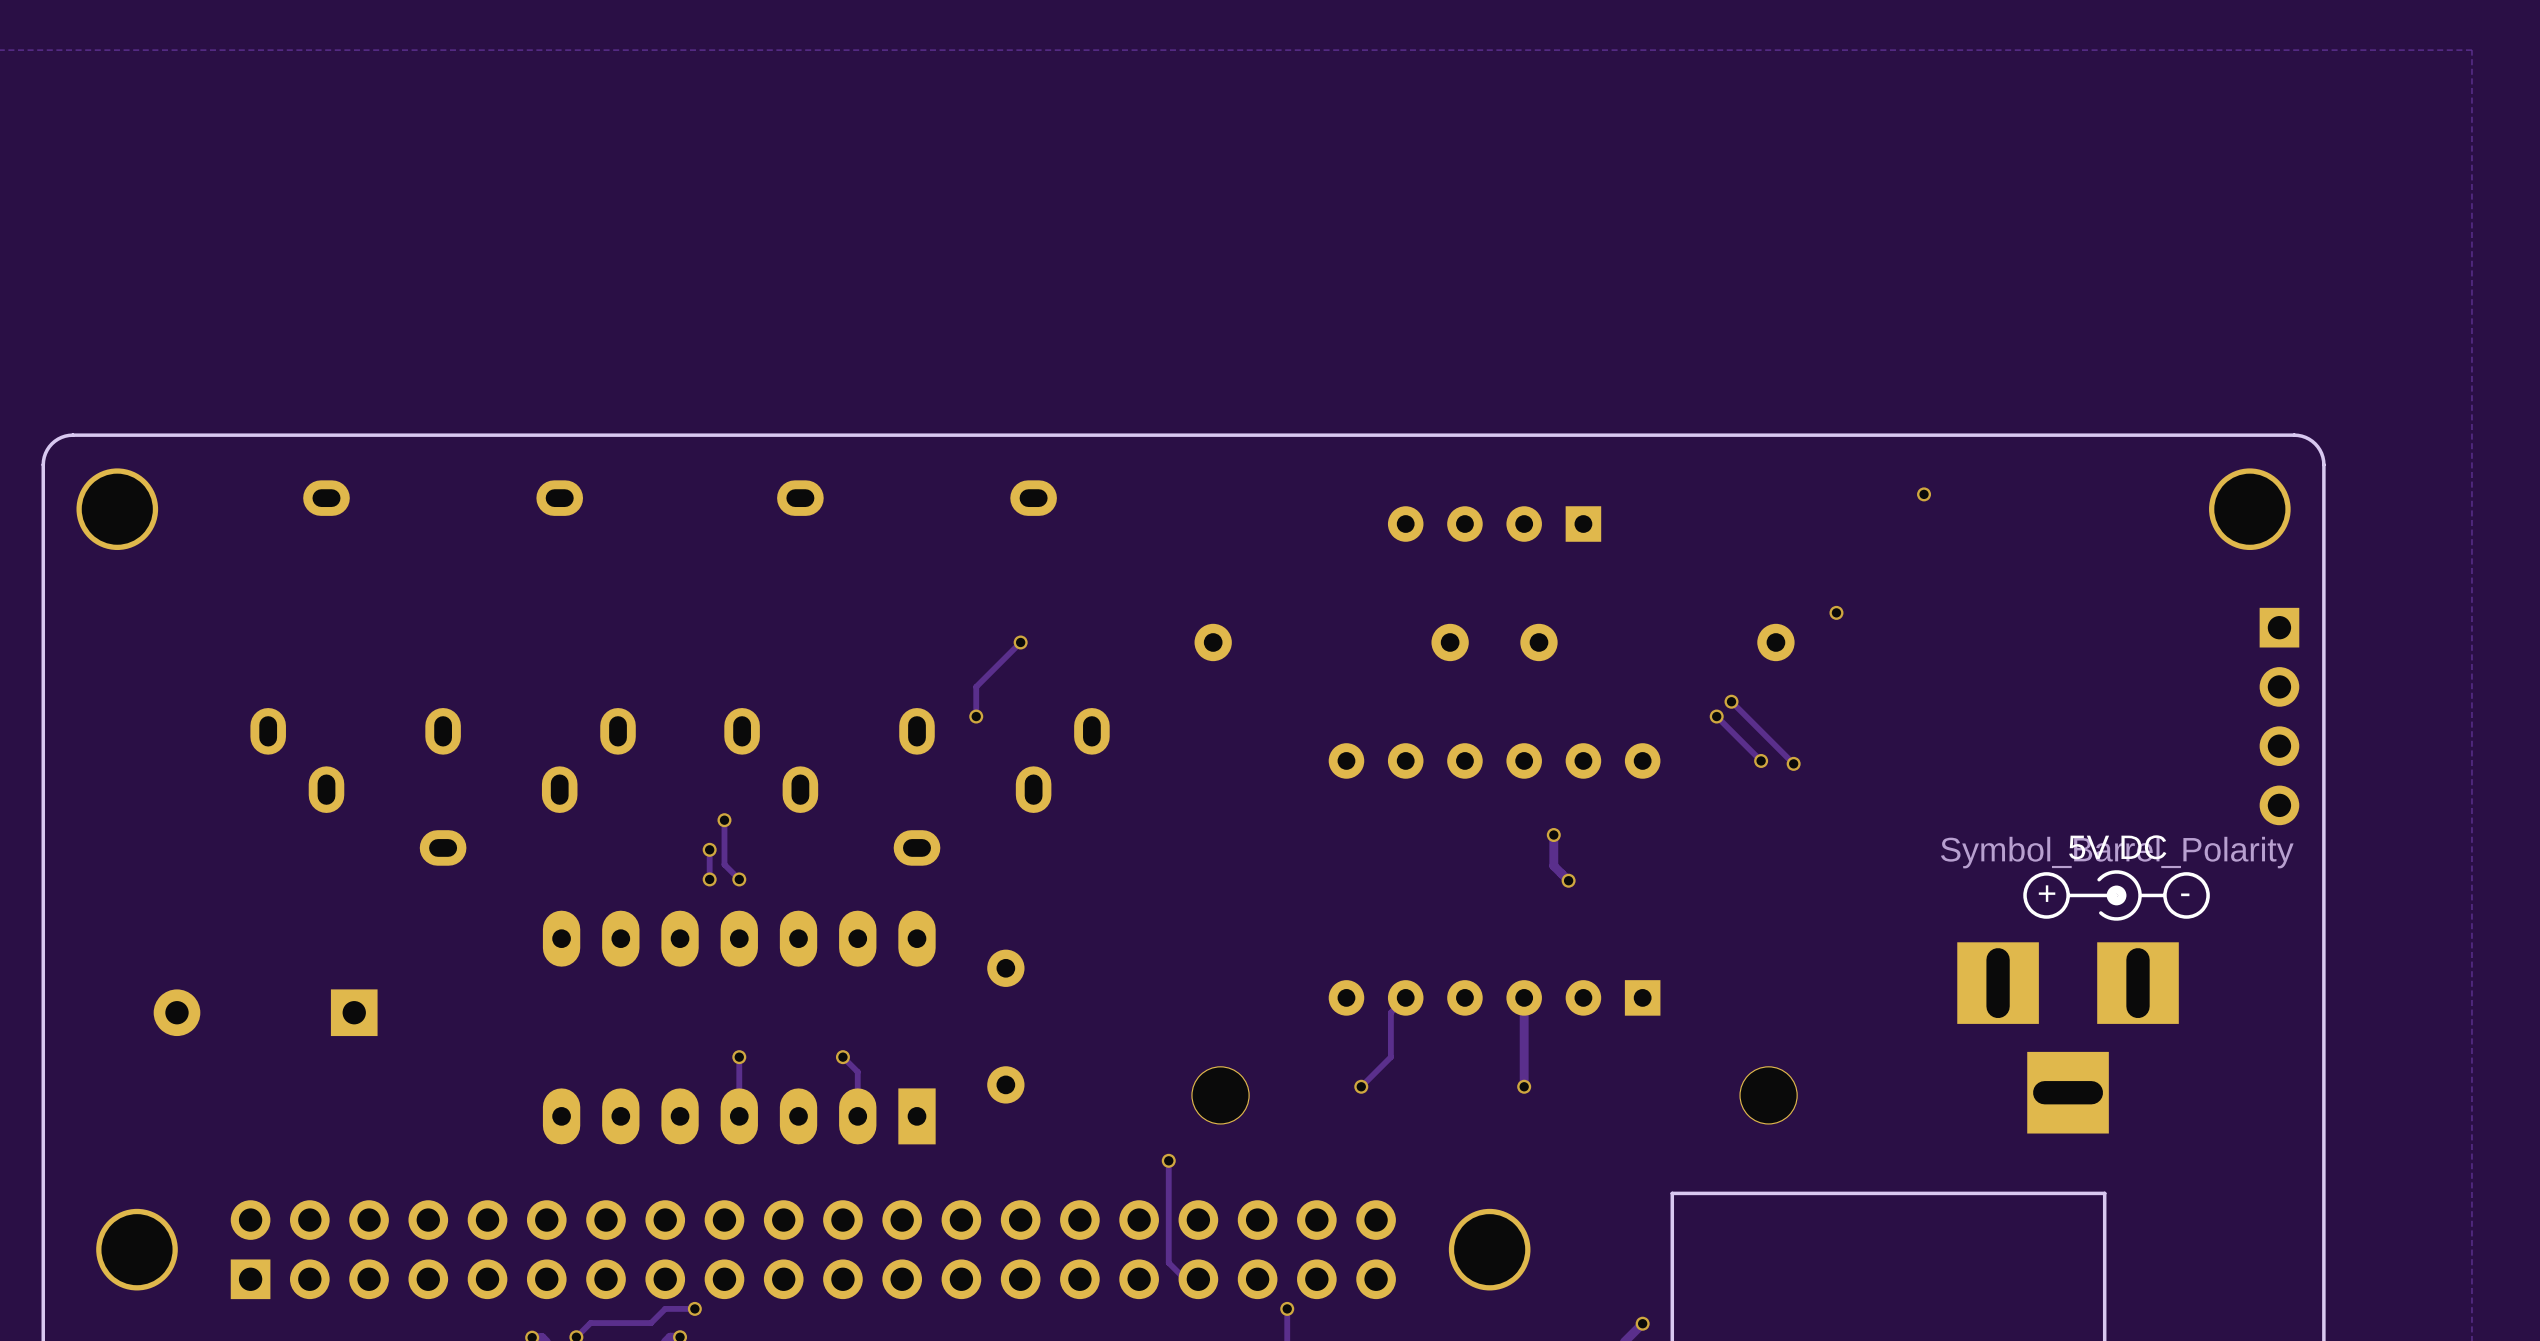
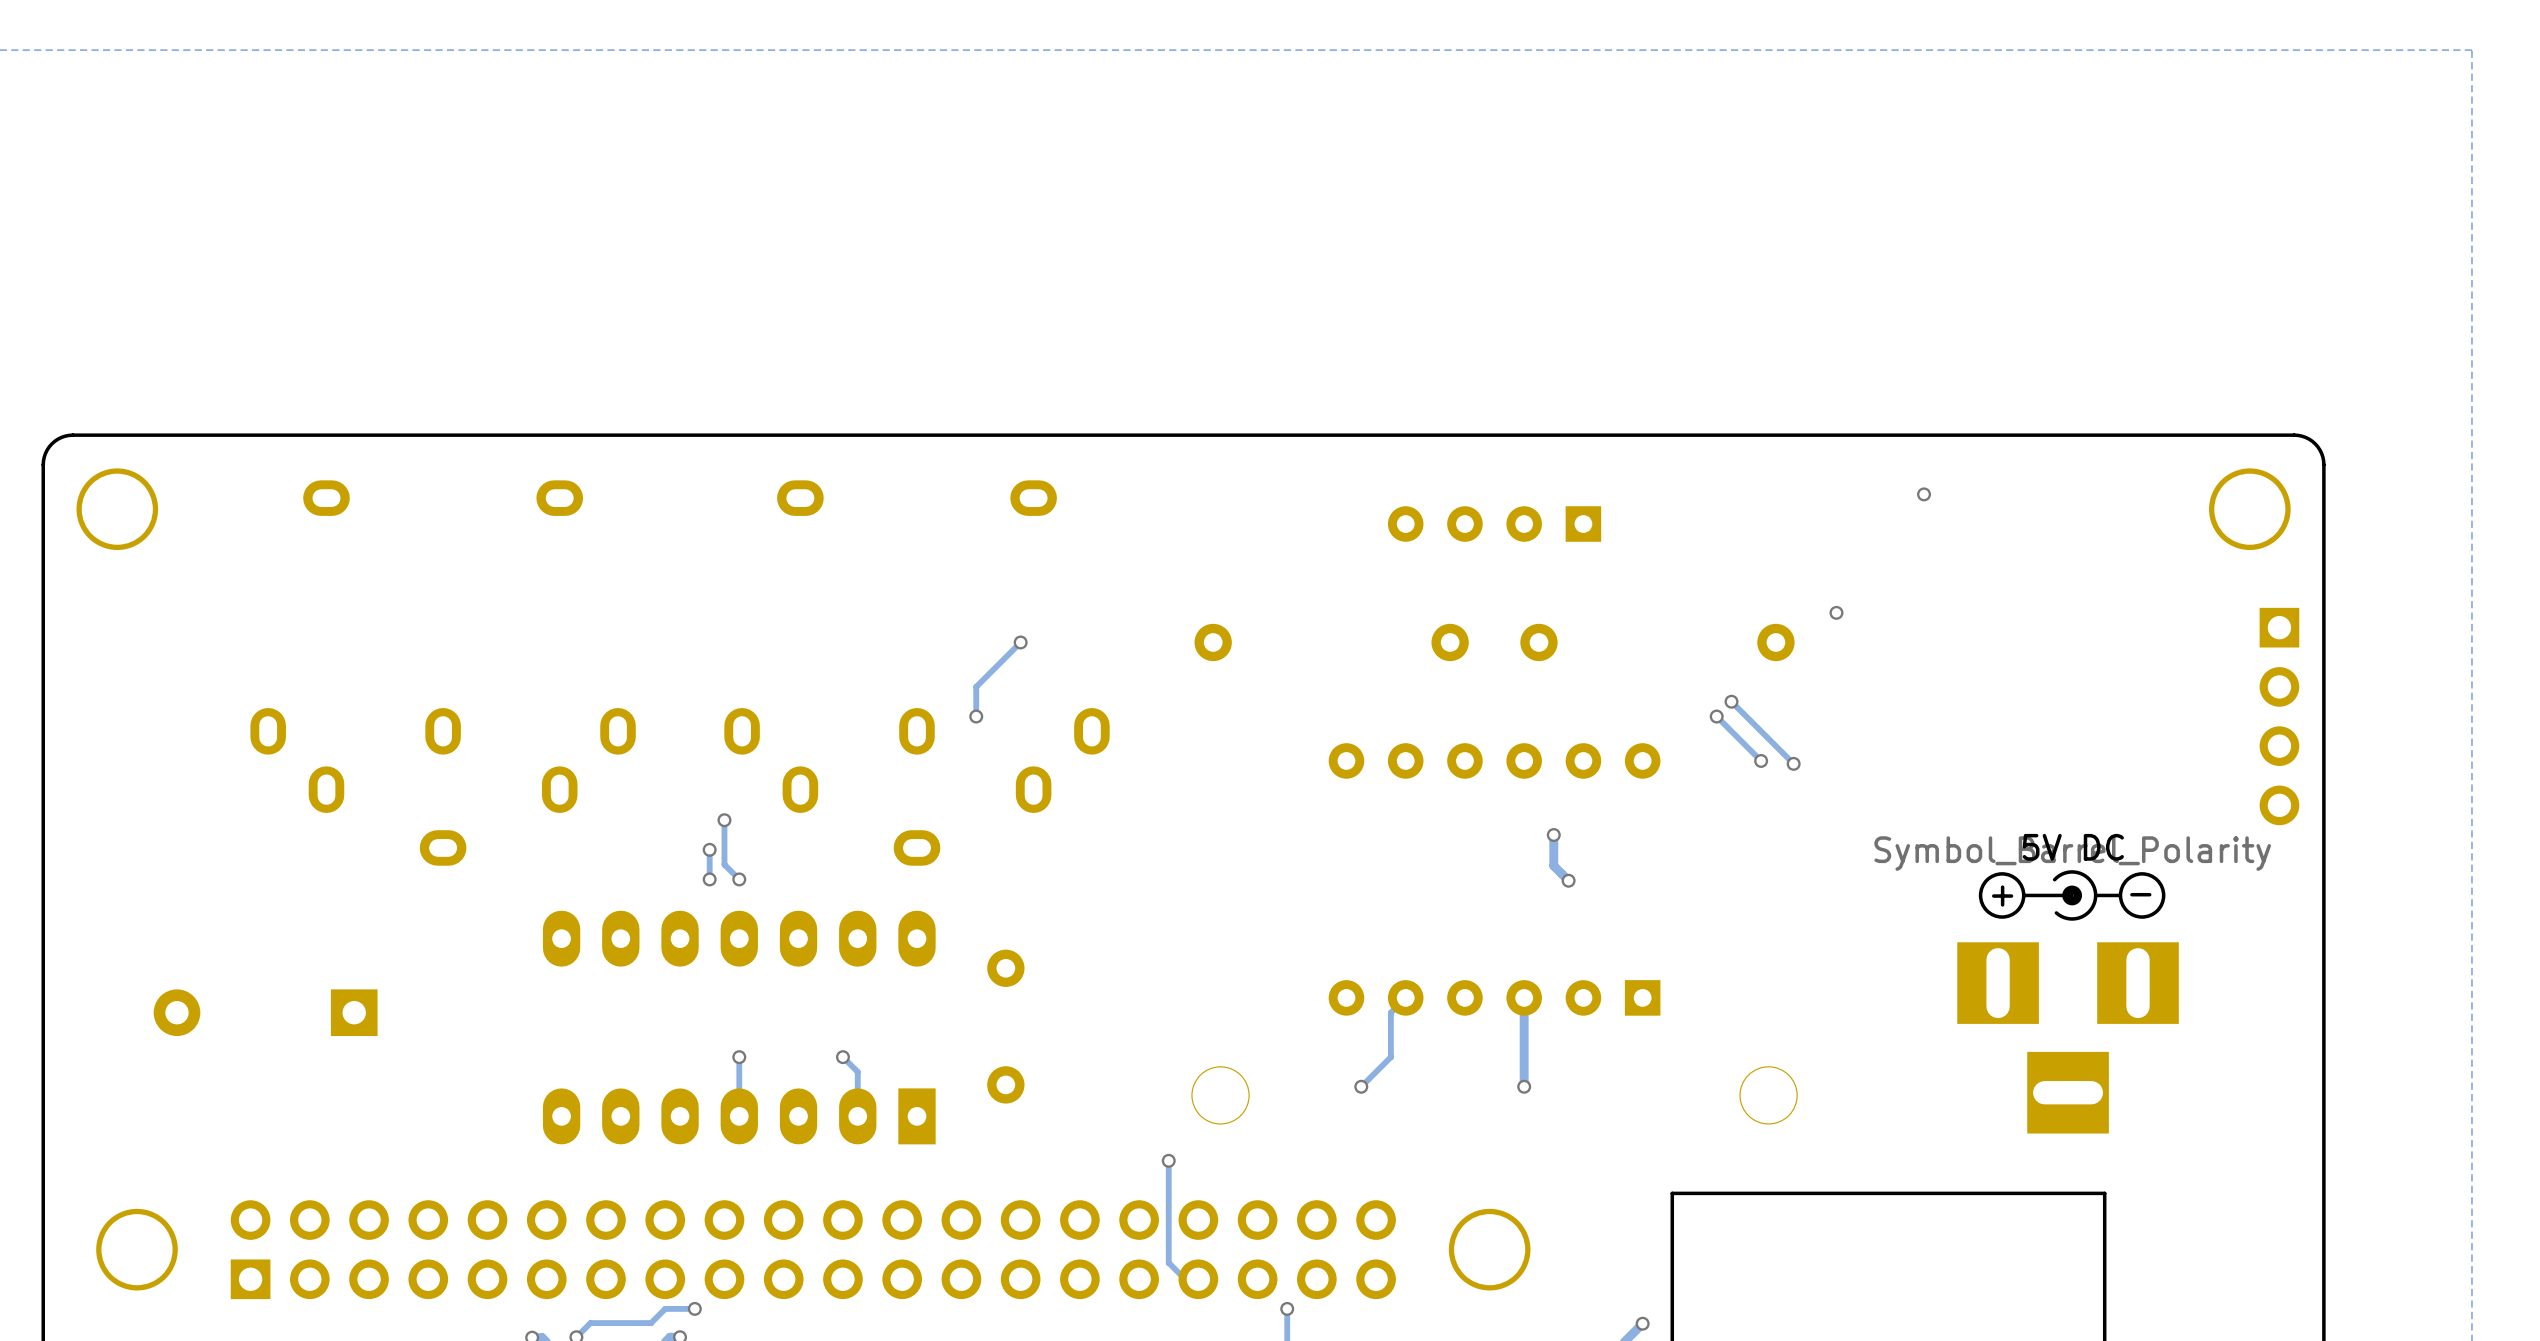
text position: 5V DC (2117, 847) -> 5V DC (2073, 847)
text position: + (2047, 893) -> + (2002, 896)
text position: - (2185, 894) -> - (2140, 894)
drawing position: (2116, 895) -> (2072, 895)

